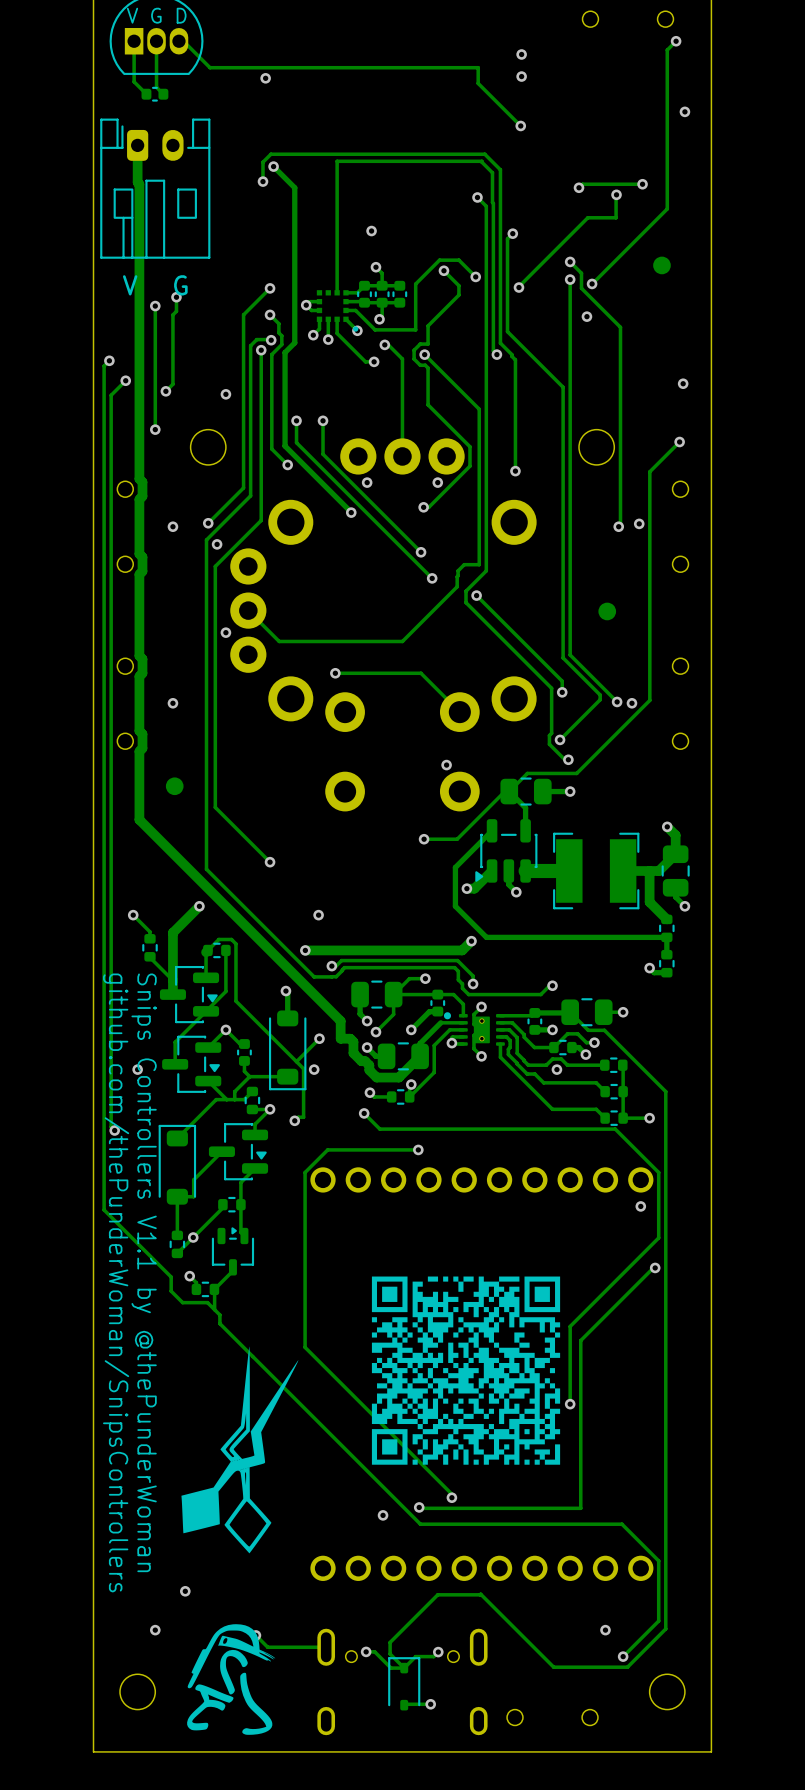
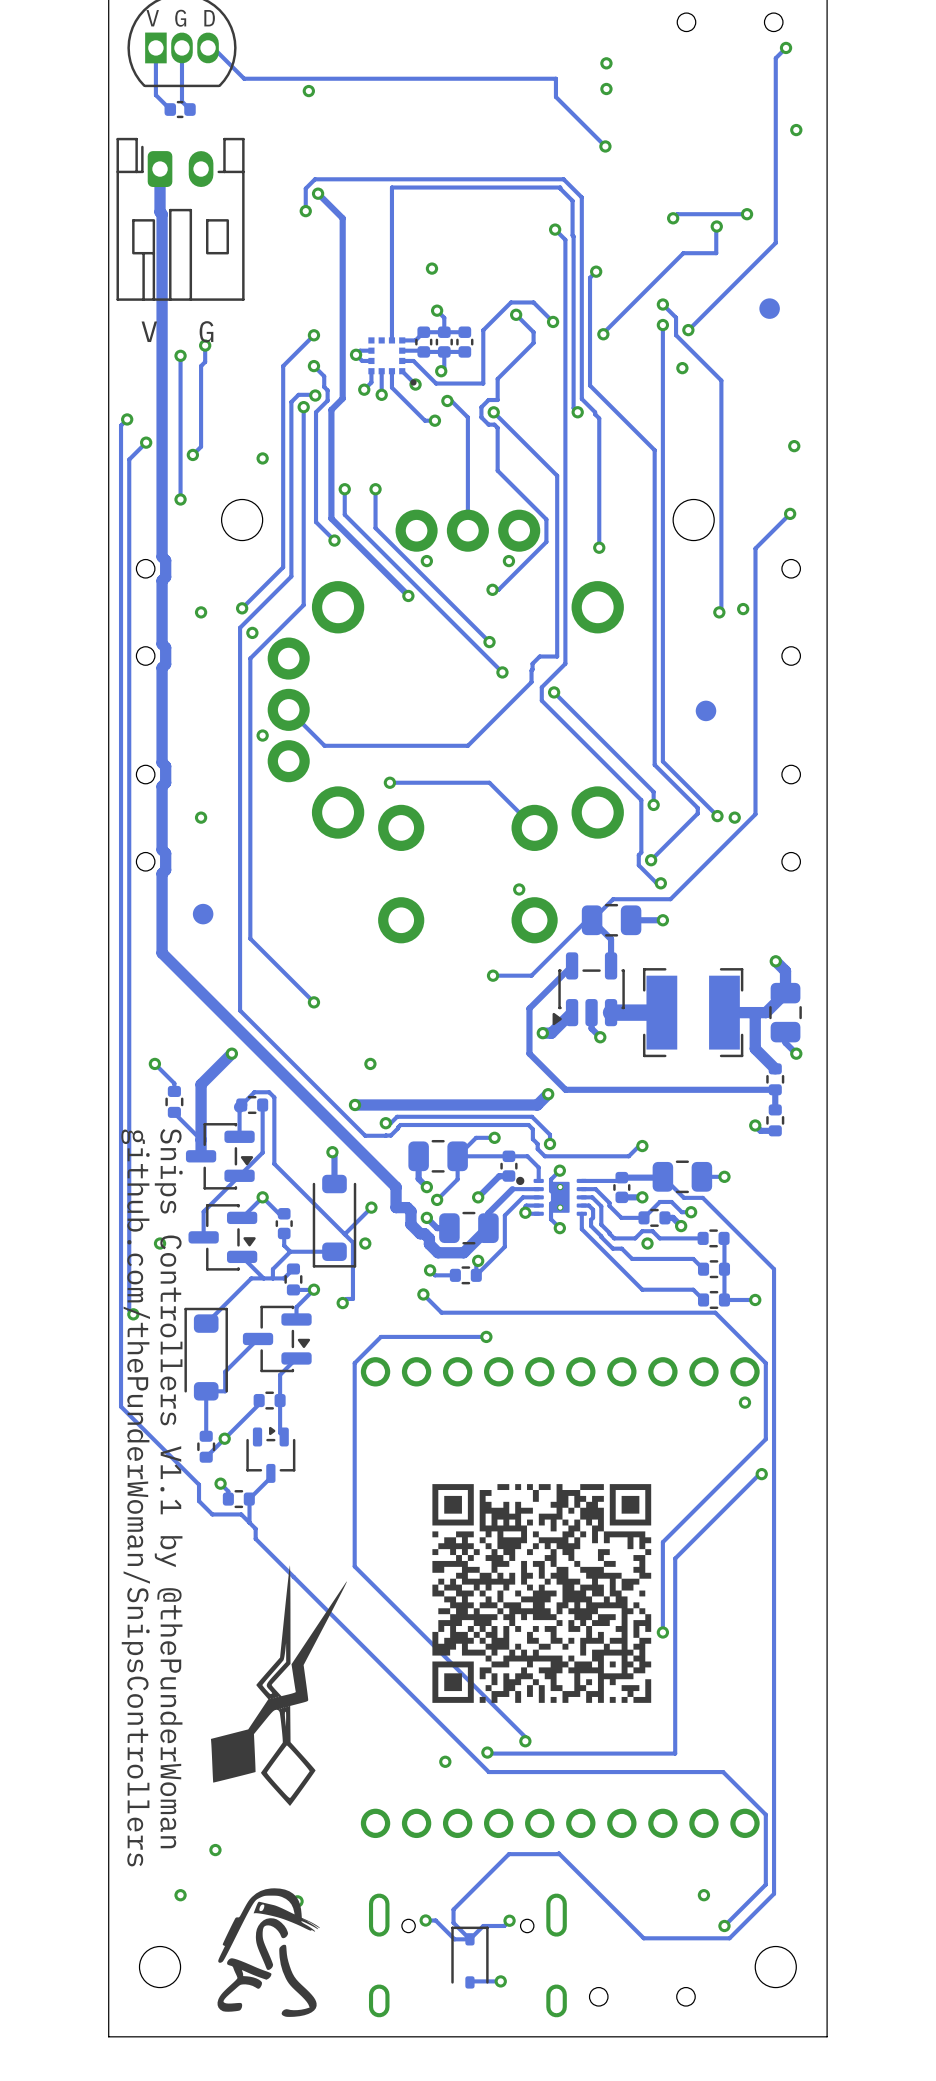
track: (255, 1635) (267, 1647) (326, 1647) -> none

